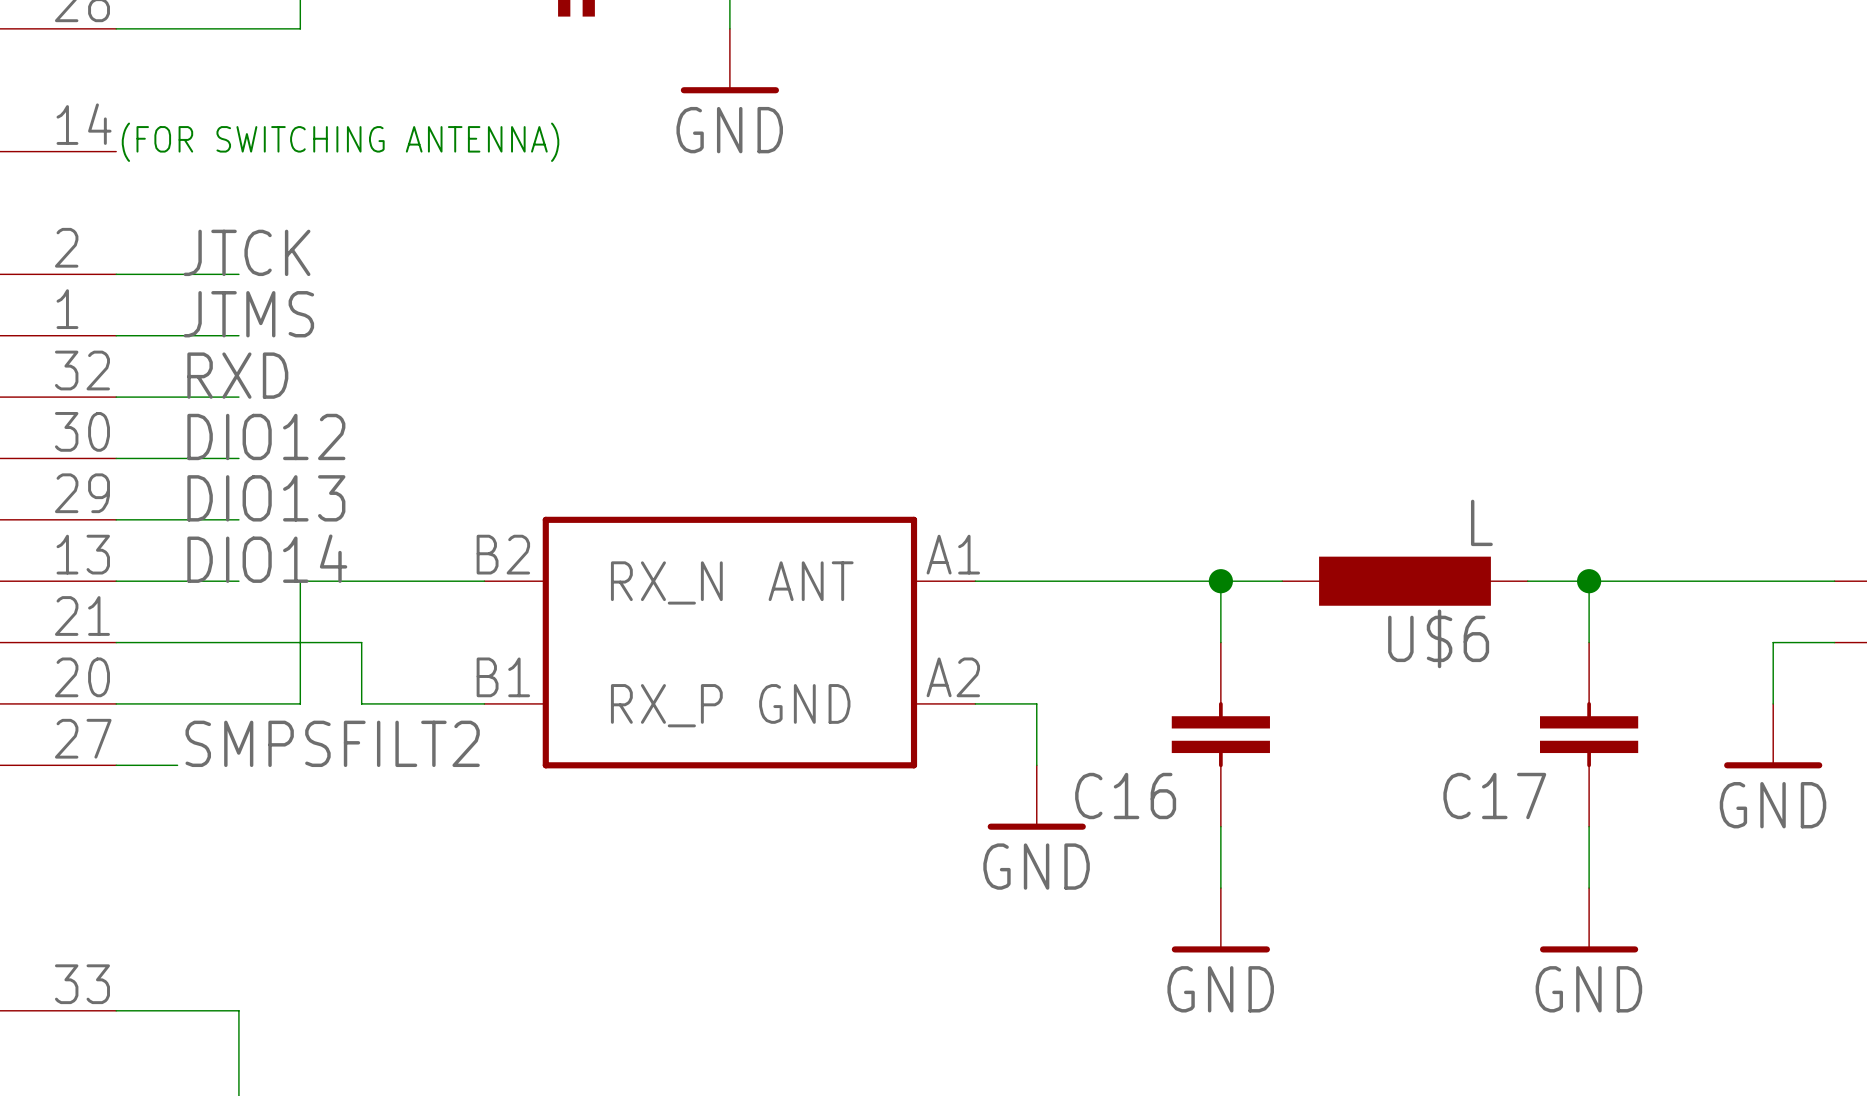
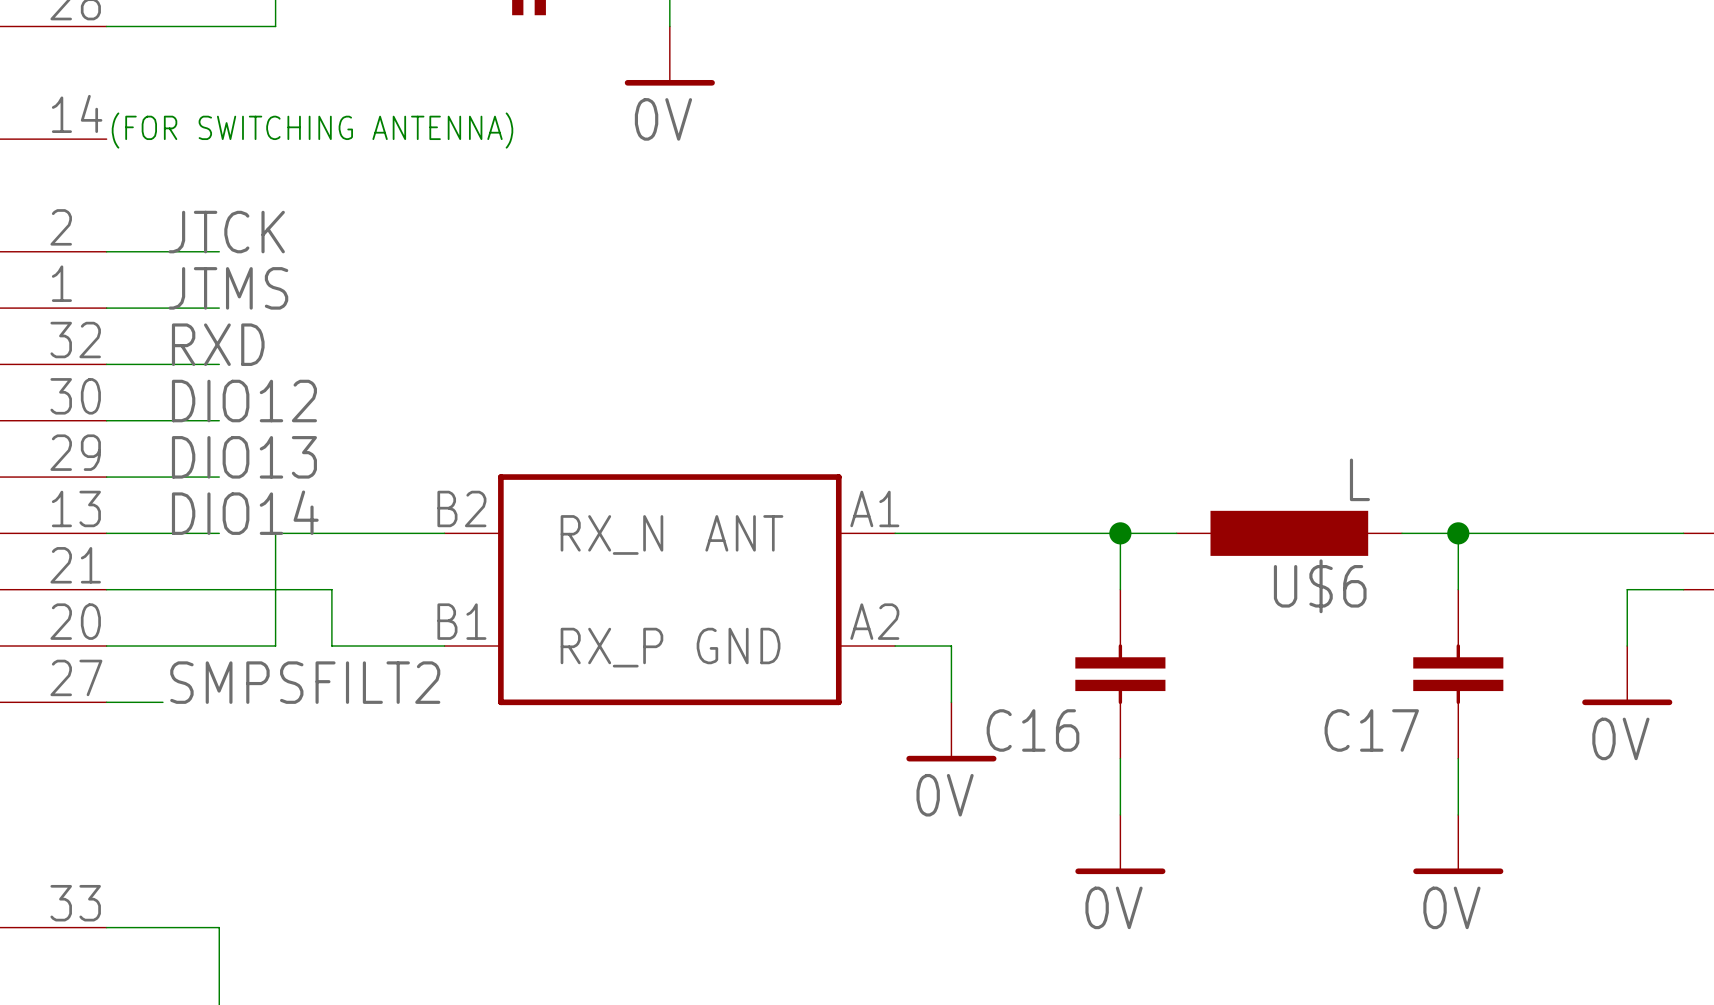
power symbol: GND (729, 61) -> 0V (669, 56)
power symbol: GND (1773, 736) -> 0V (1627, 675)
power symbol: GND (1036, 797) -> 0V (951, 731)
power symbol: GND (1220, 920) -> 0V (1120, 844)
power symbol: GND (1589, 920) -> 0V (1458, 844)

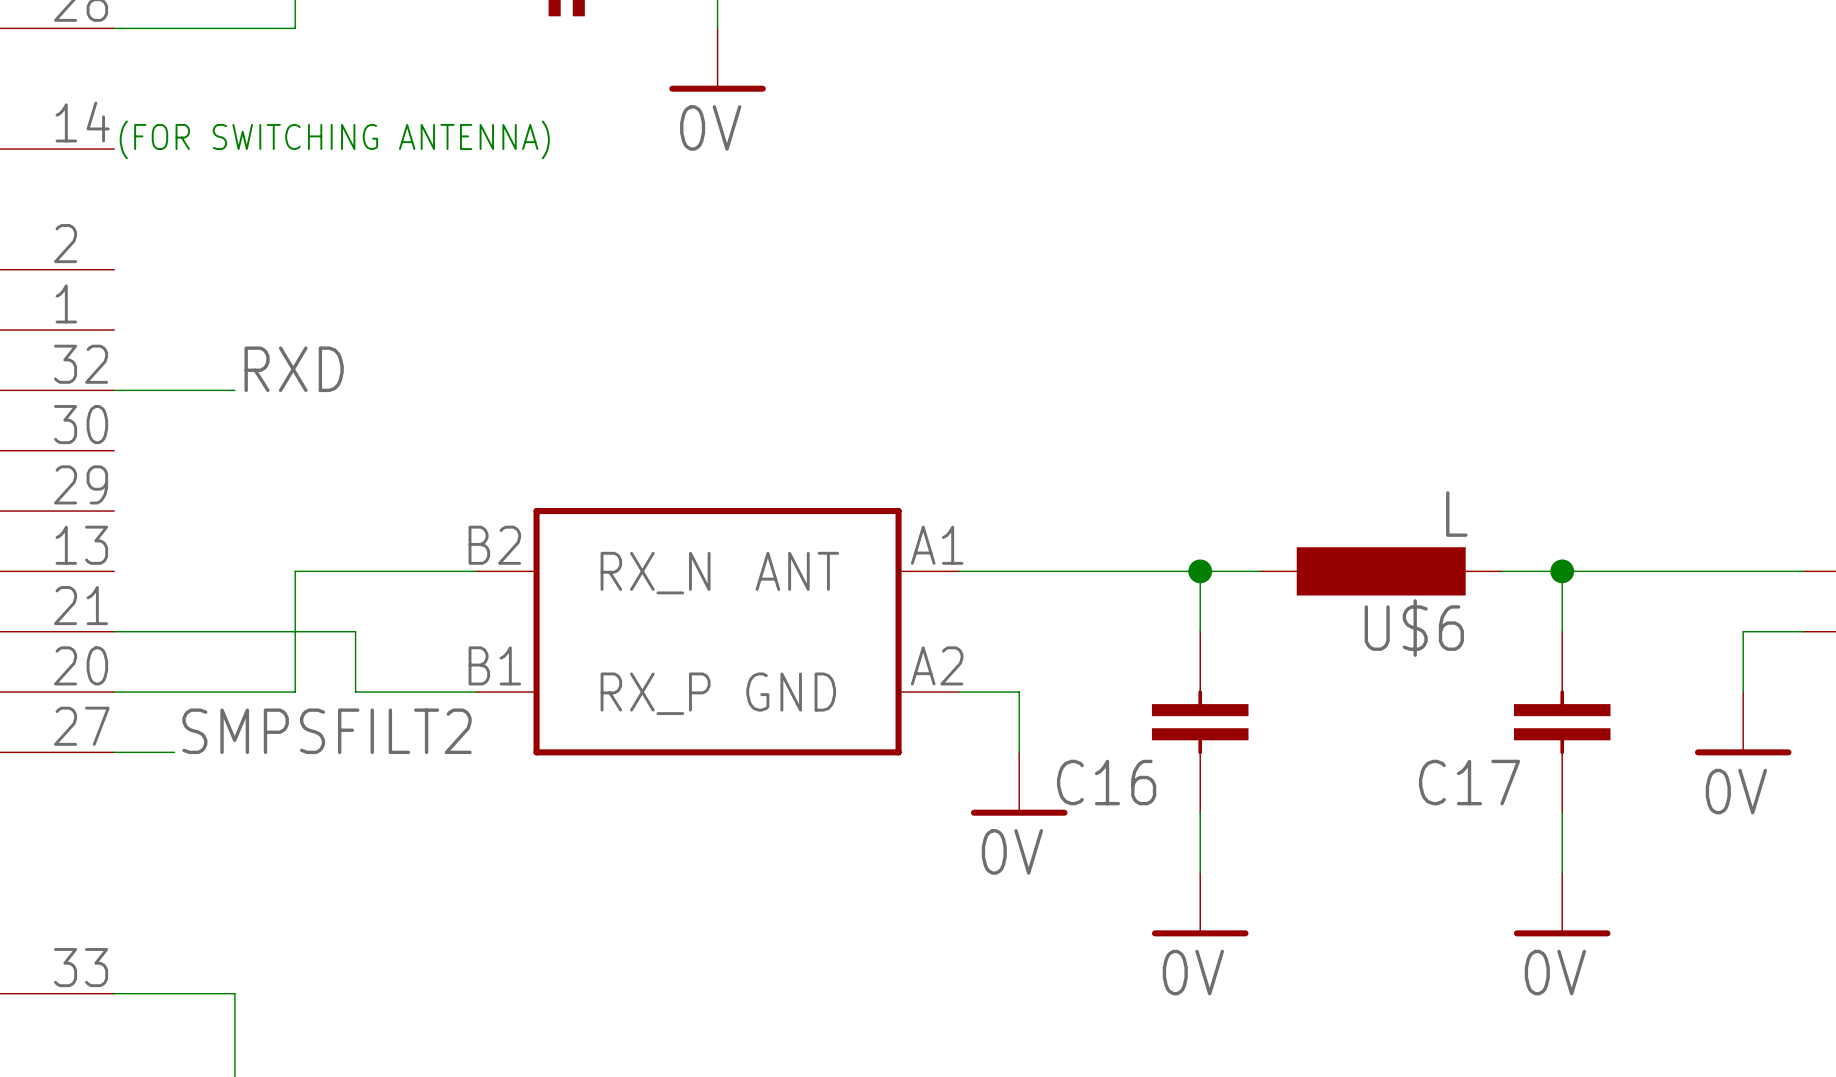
label: JTCK (226, 232) -> none
wire: (106, 251) (219, 251) -> none
label: JTMS (228, 288) -> none
wire: (106, 308) (219, 308) -> none
label position: RXD (218, 344) -> RXD (294, 369)
label: DIO12 (244, 401) -> none
wire: (106, 420) (219, 420) -> none
label: DIO13 (244, 457) -> none
wire: (106, 477) (219, 477) -> none
label: DIO14 (245, 512) -> none
wire: (106, 533) (219, 533) -> none

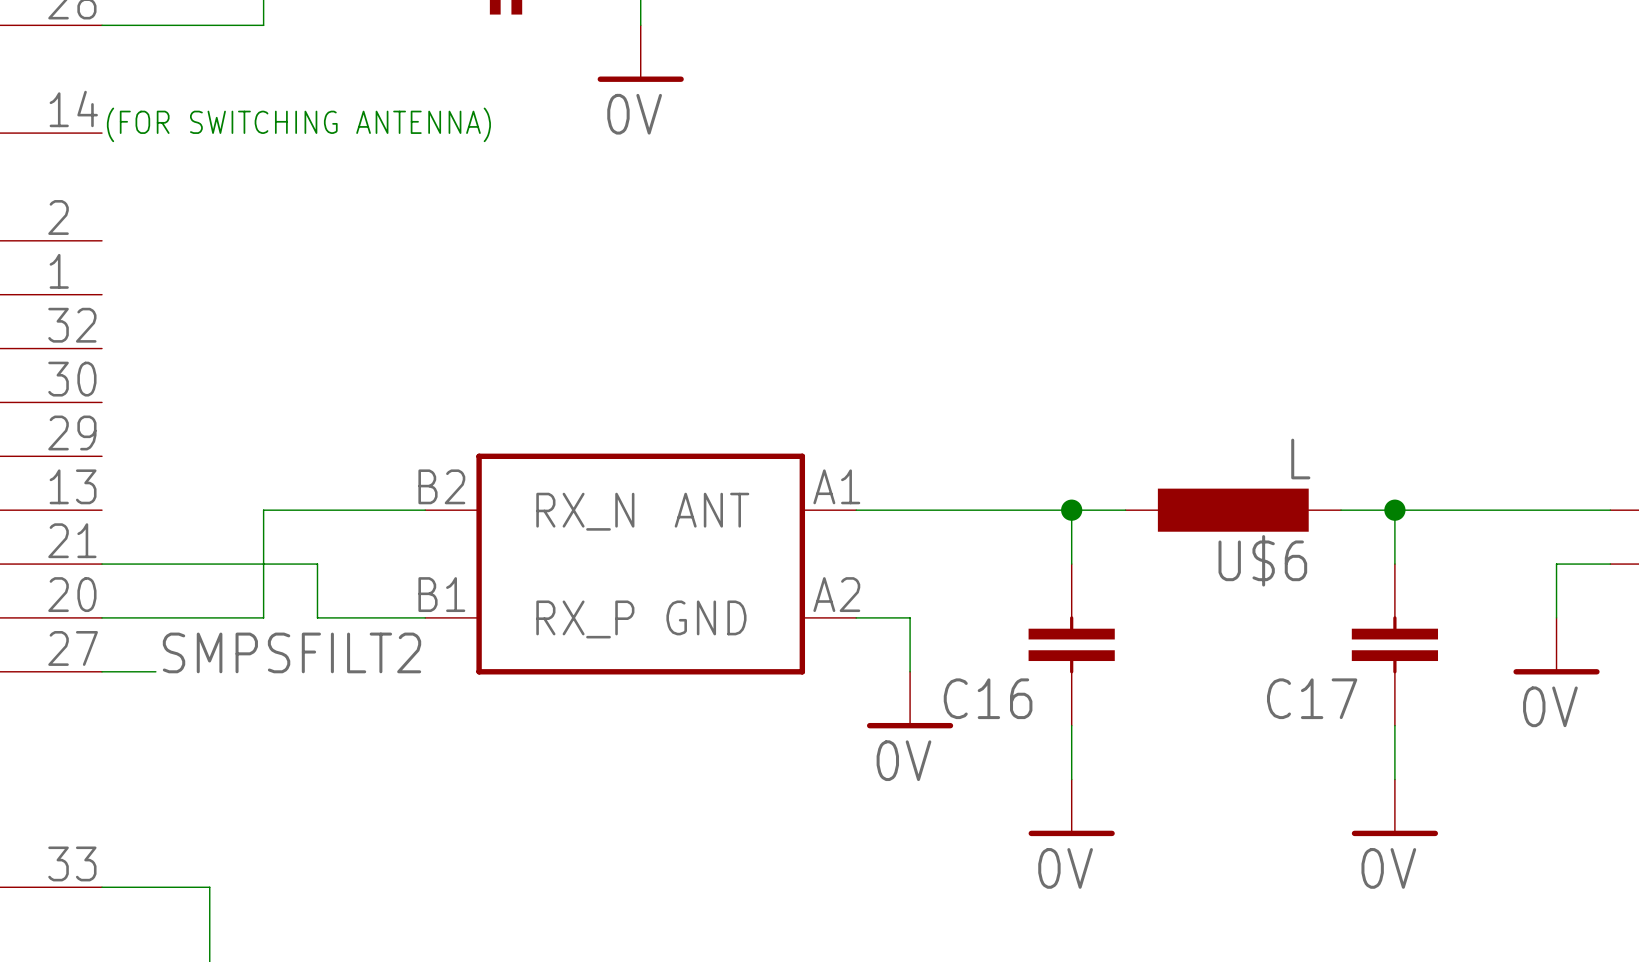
label: RXD (294, 369) -> none
wire: (114, 390) (234, 390) -> none

